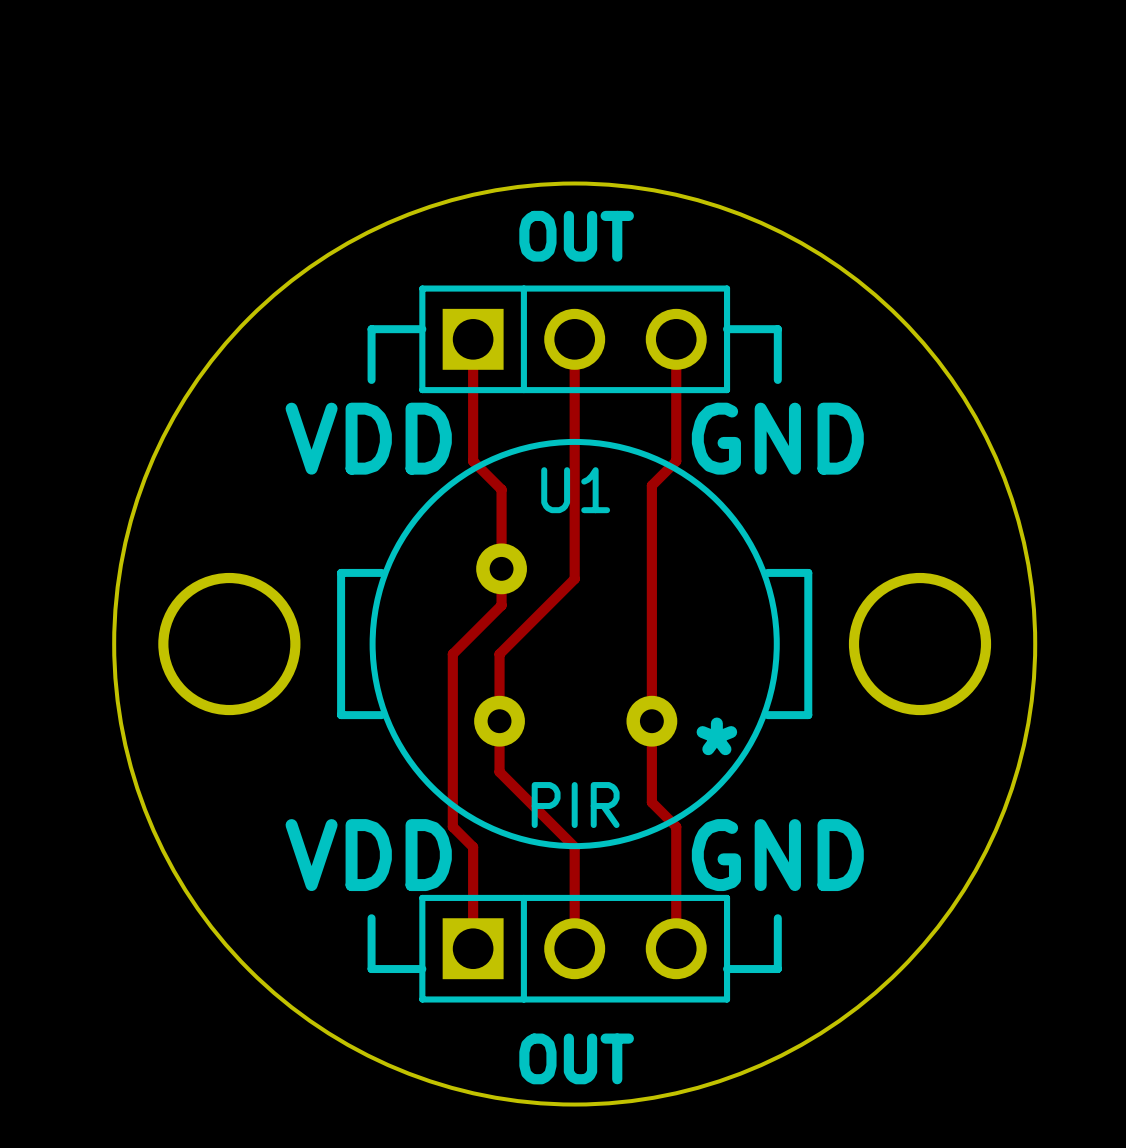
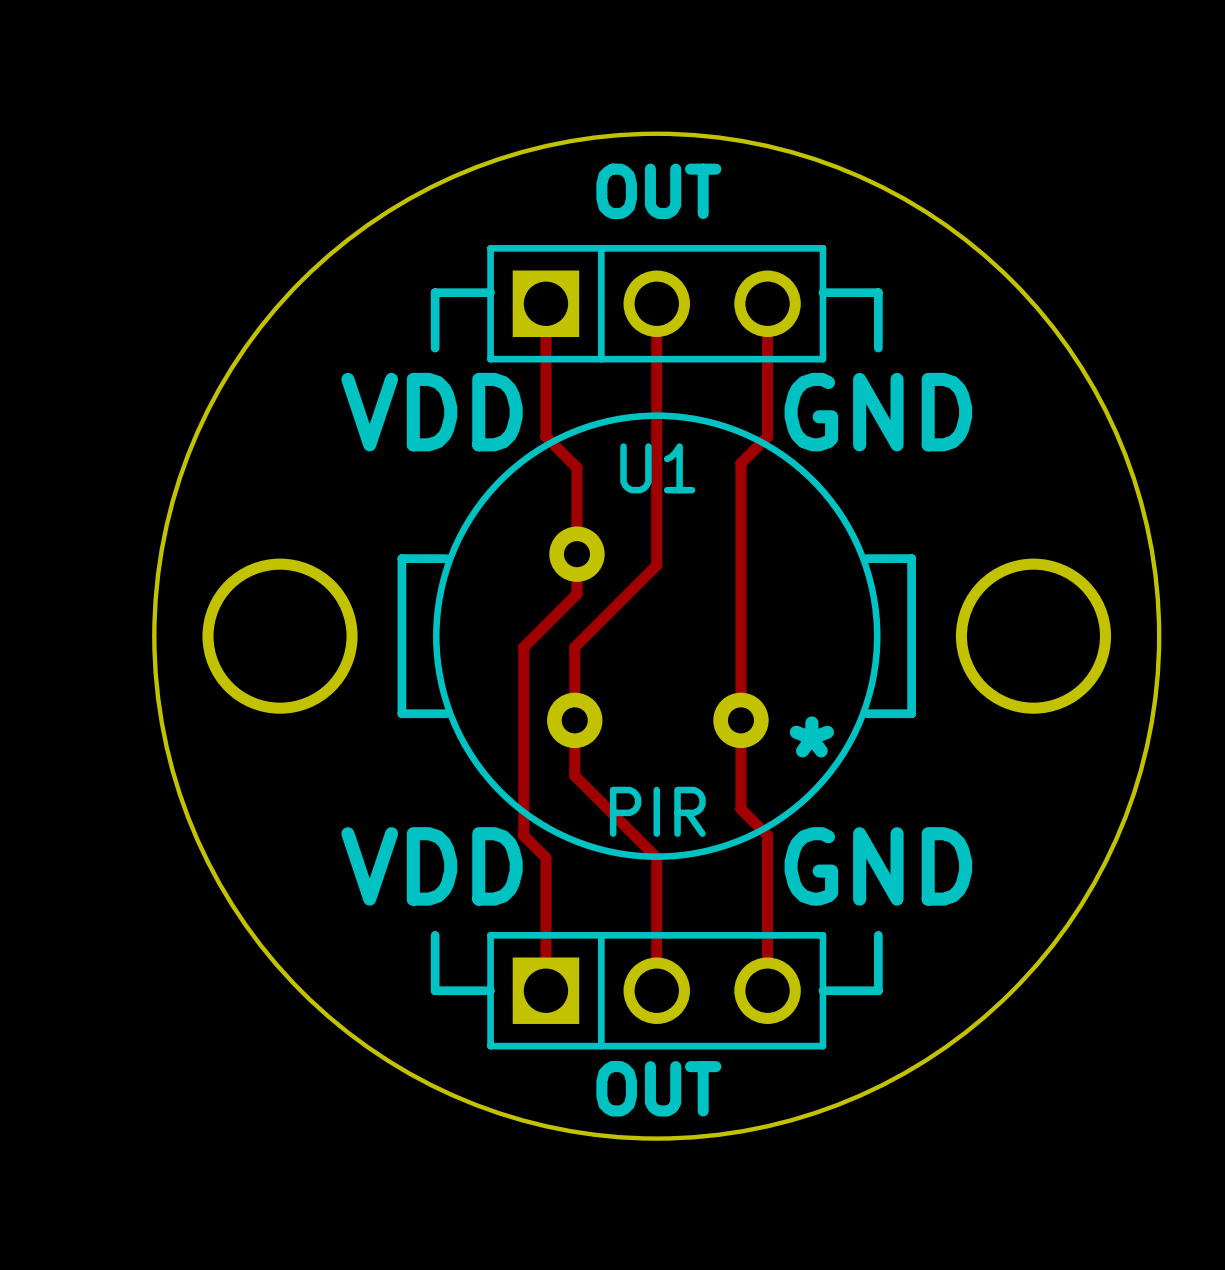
part position: (574, 948) -> (656, 990)

